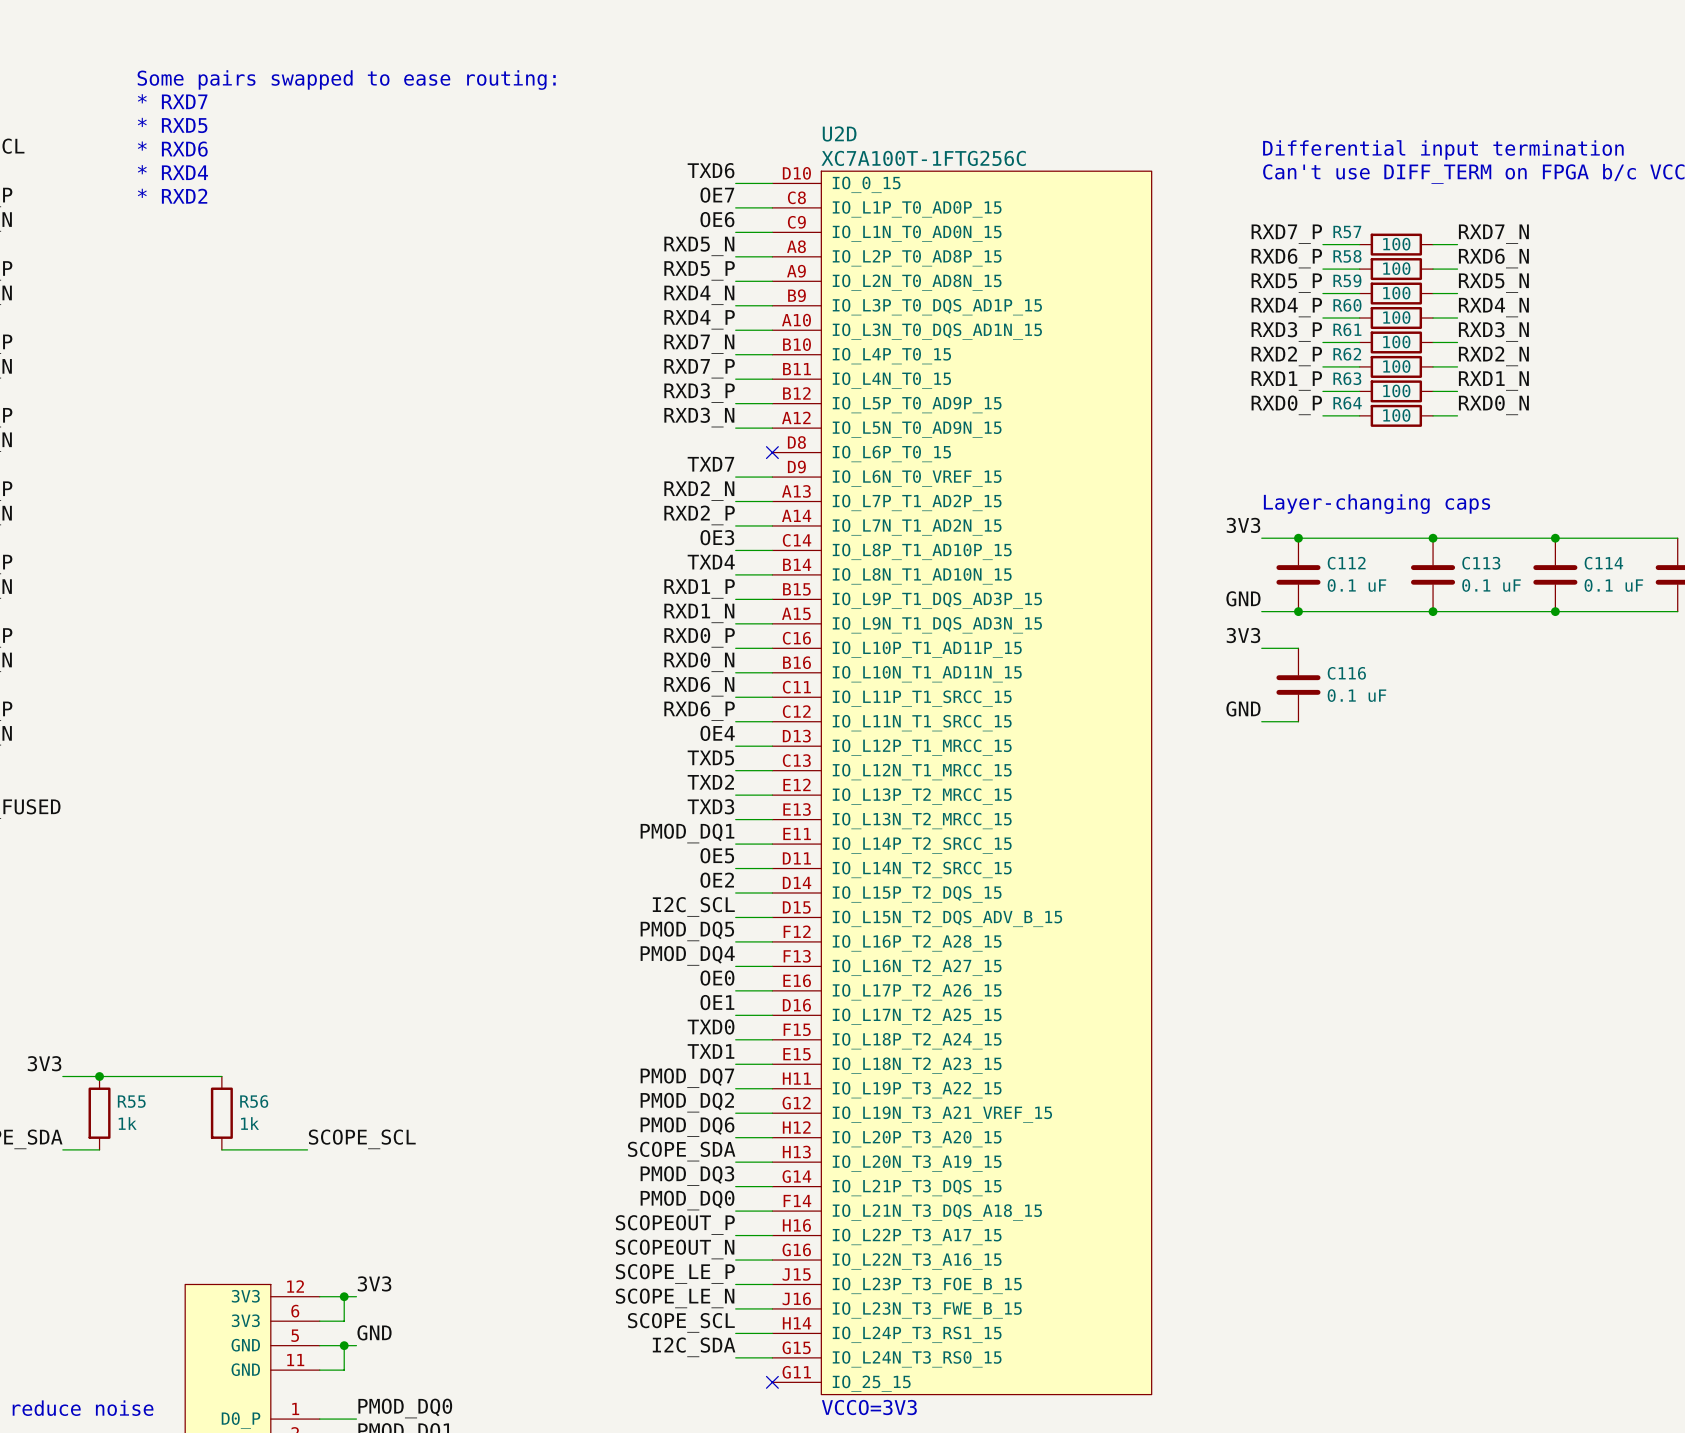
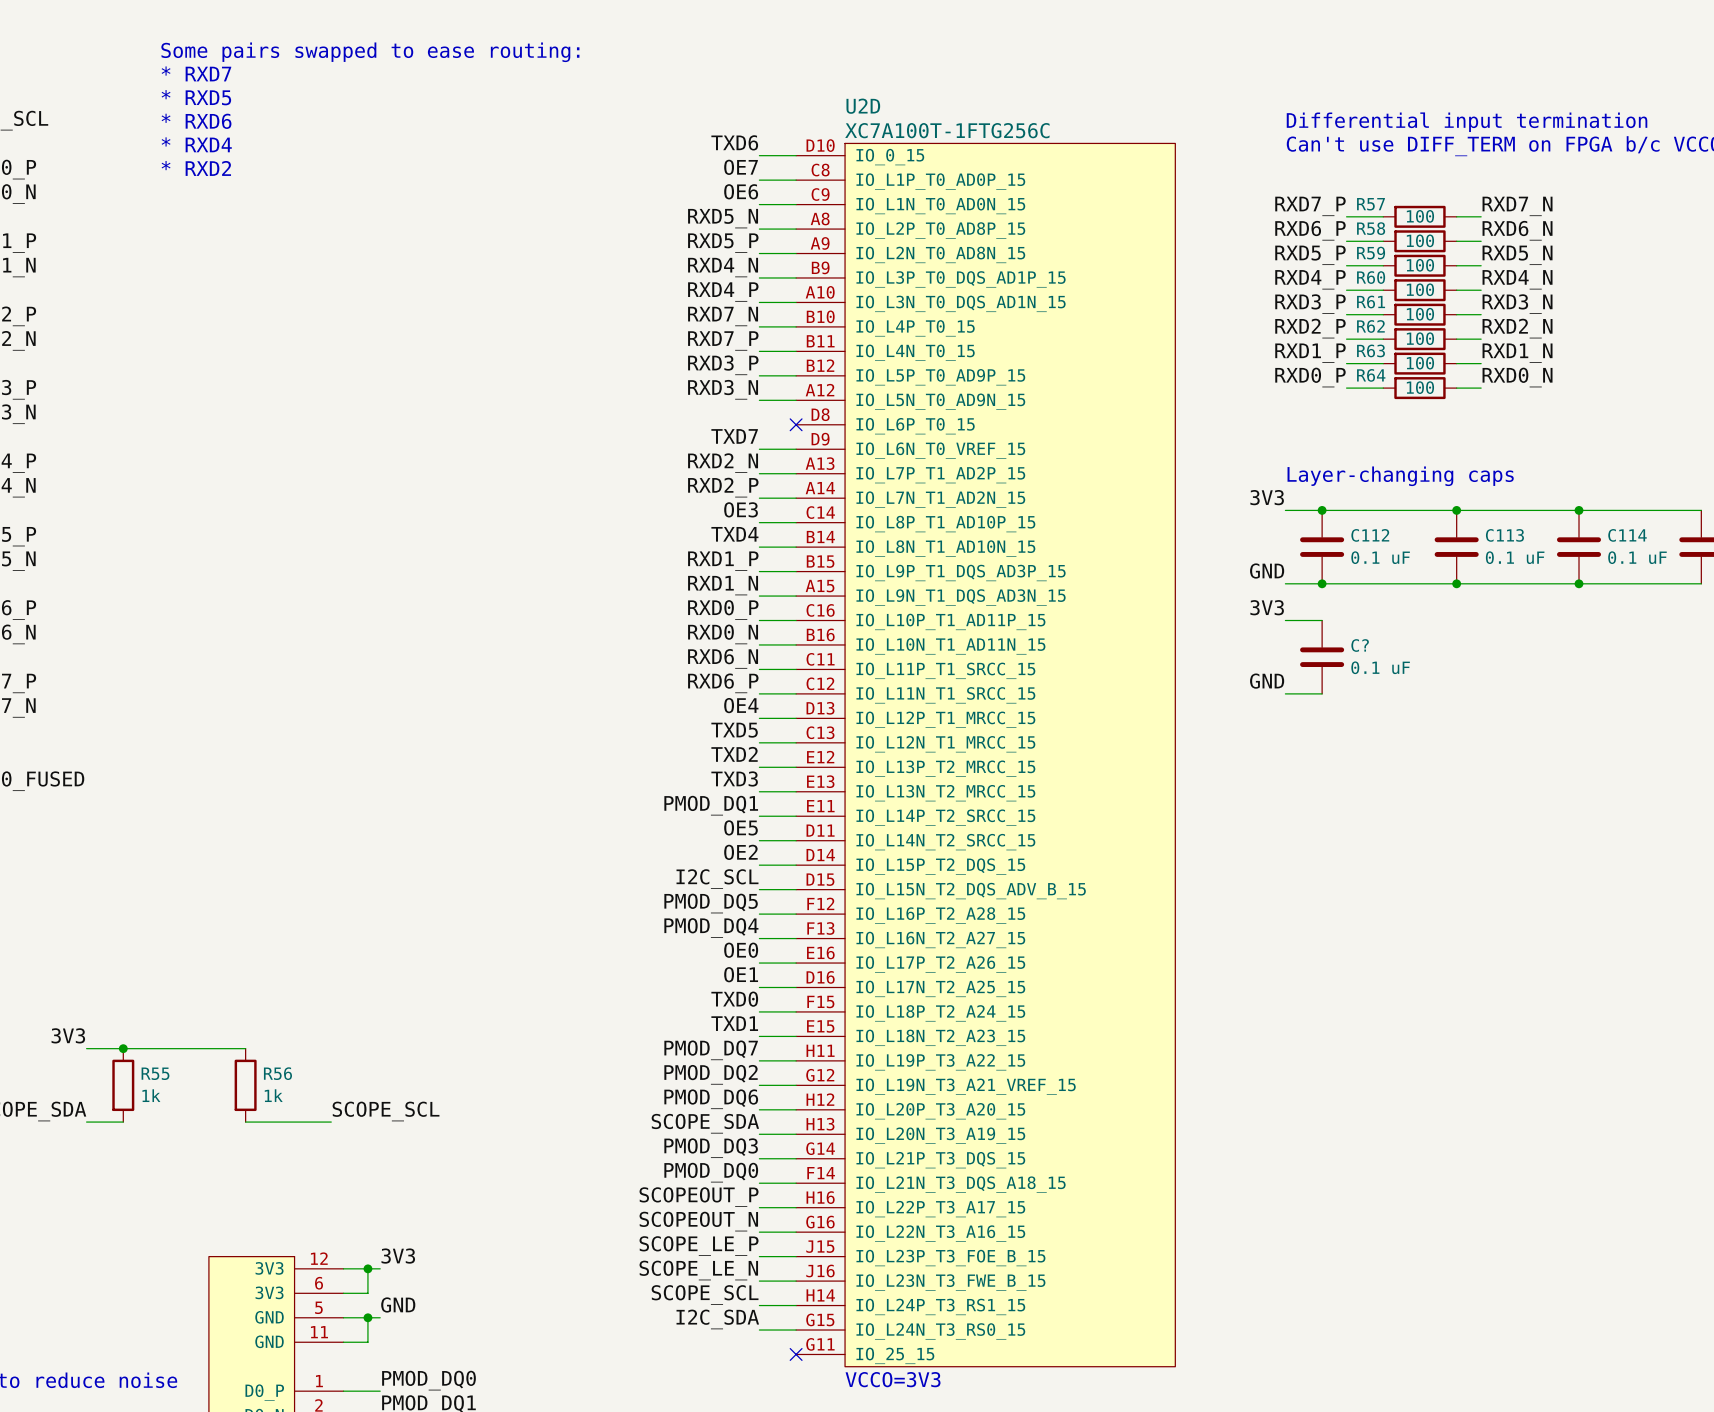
C116 name: C116 (1346, 673) -> C? (1360, 645)

